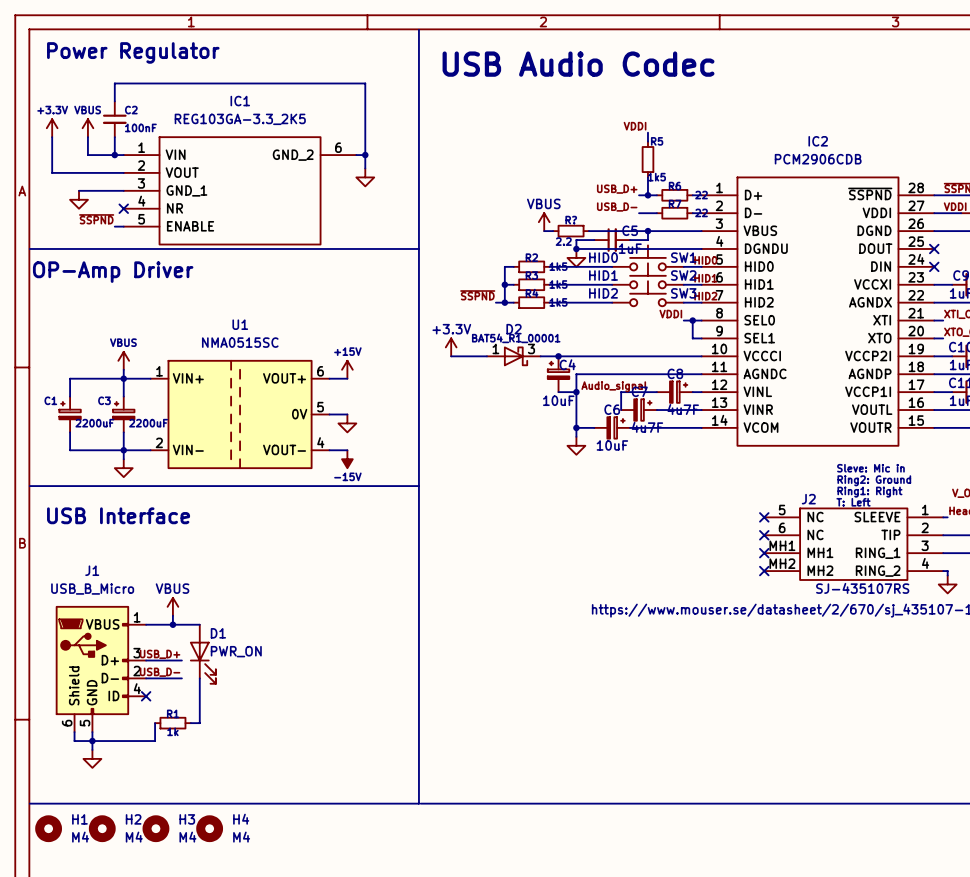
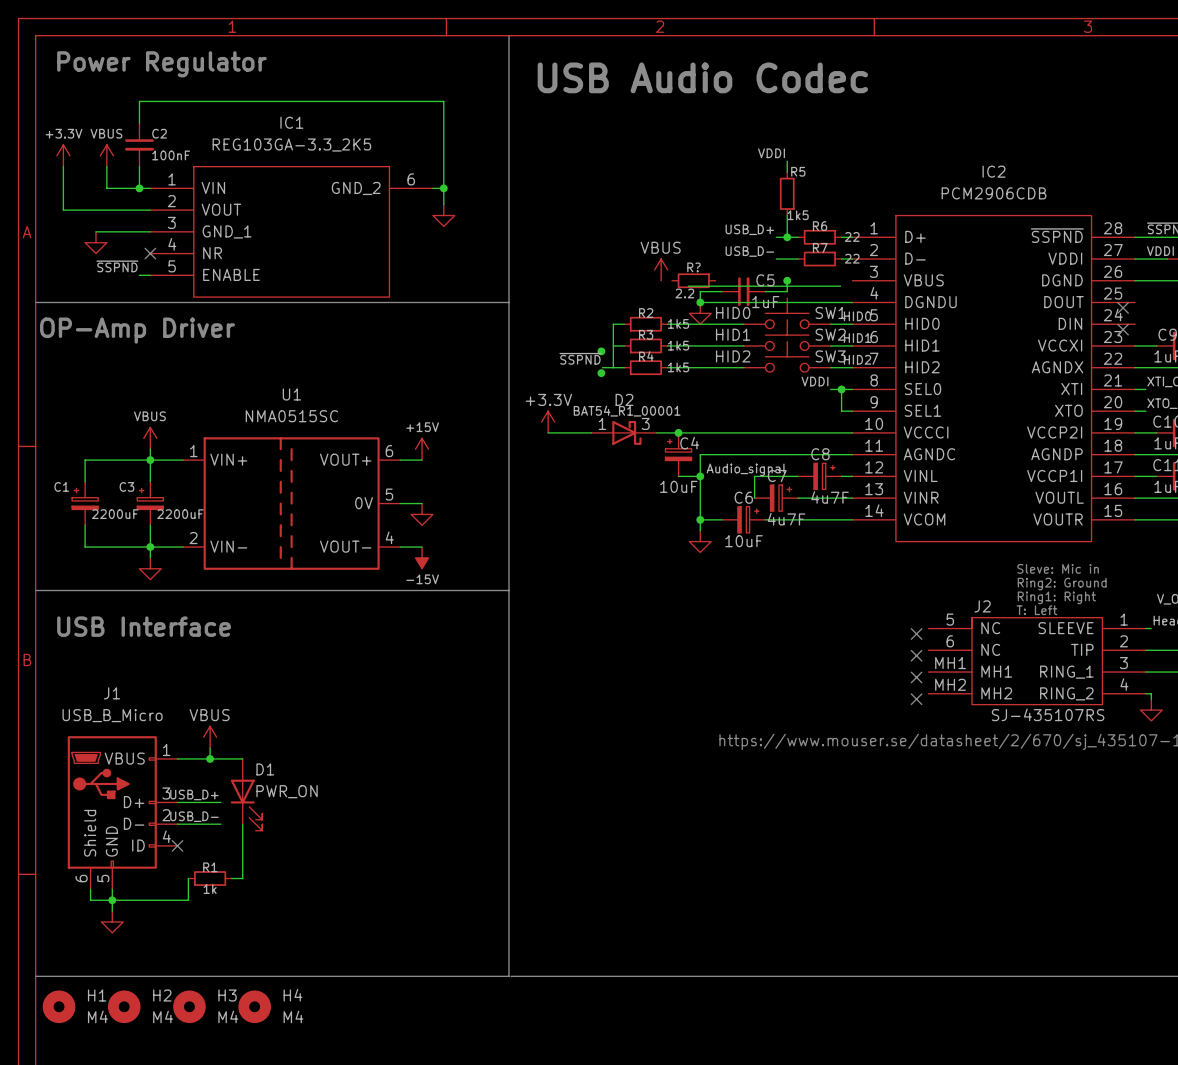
wire: (544, 231) (553, 231) -> none
wire: (588, 231) (701, 231) -> none
wire: none -> (688, 286) (840, 286)
no-connect mark: (934, 248) -> none
no-connect mark: none -> (1123, 307)
no-connect mark: (934, 266) -> none
no-connect mark: none -> (1123, 329)
junction: (504, 284) -> none
junction: none -> (601, 351)
junction: (504, 302) -> none
junction: none -> (601, 373)
no-connect mark: (764, 517) -> none
no-connect mark: none -> (916, 633)
no-connect mark: (764, 535) -> none
no-connect mark: none -> (916, 655)
no-connect mark: (764, 553) -> none
no-connect mark: none -> (916, 677)
no-connect mark: (764, 571) -> none
no-connect mark: none -> (916, 699)

